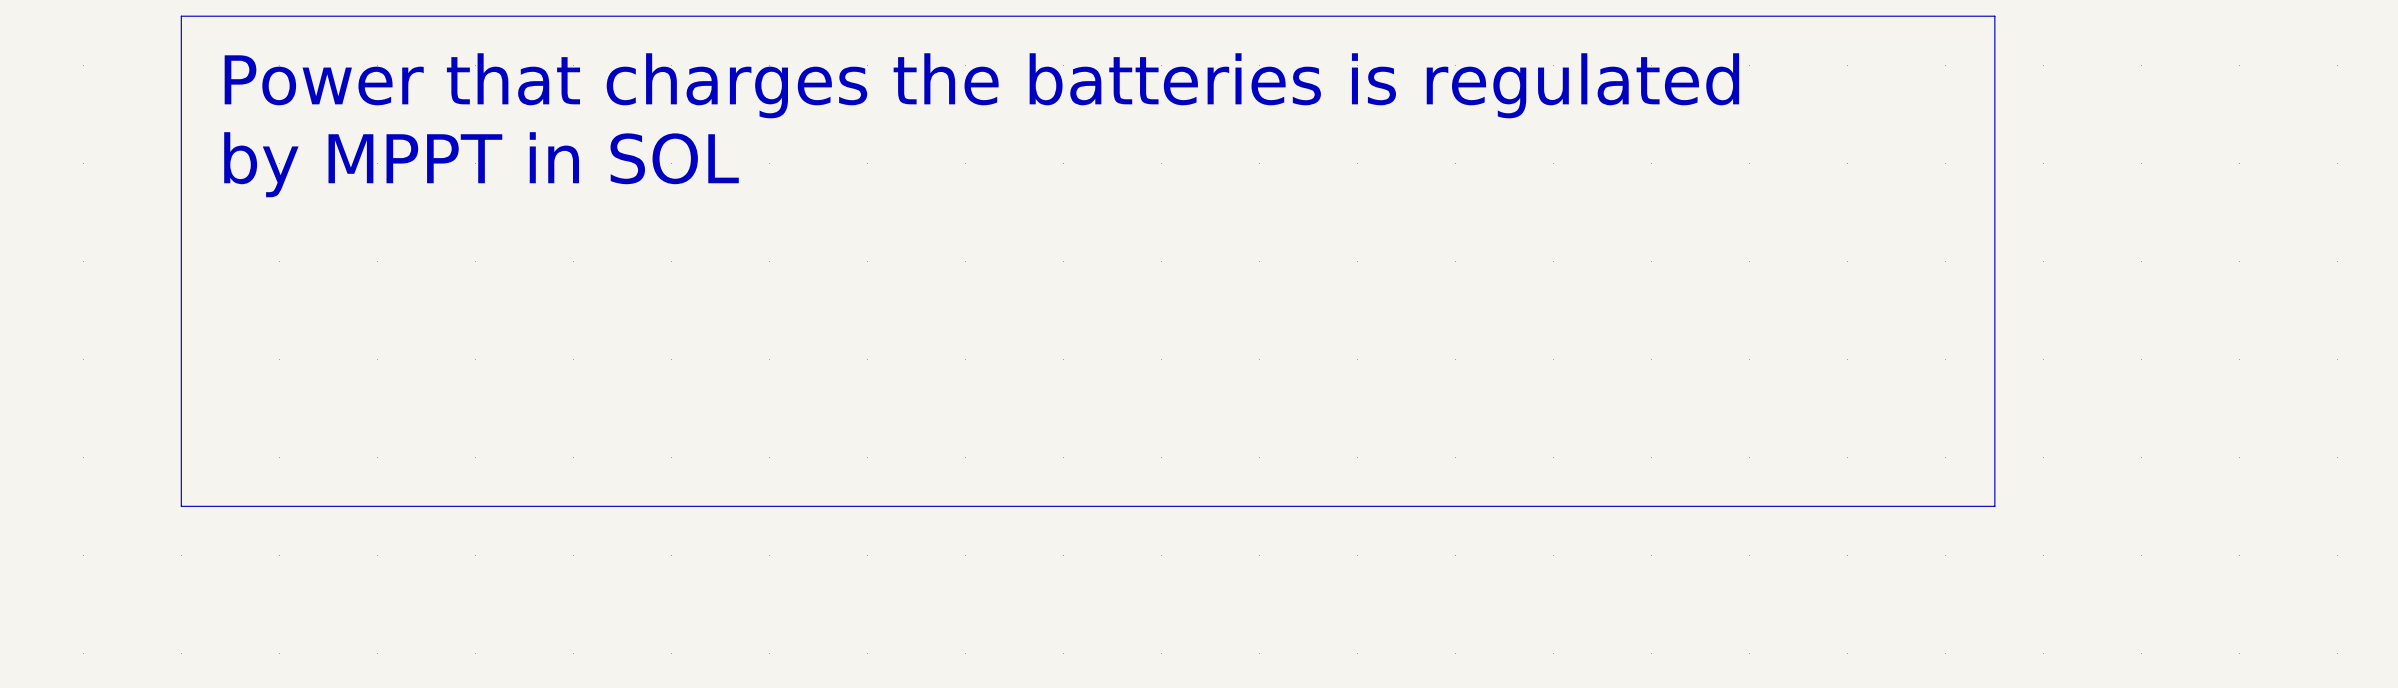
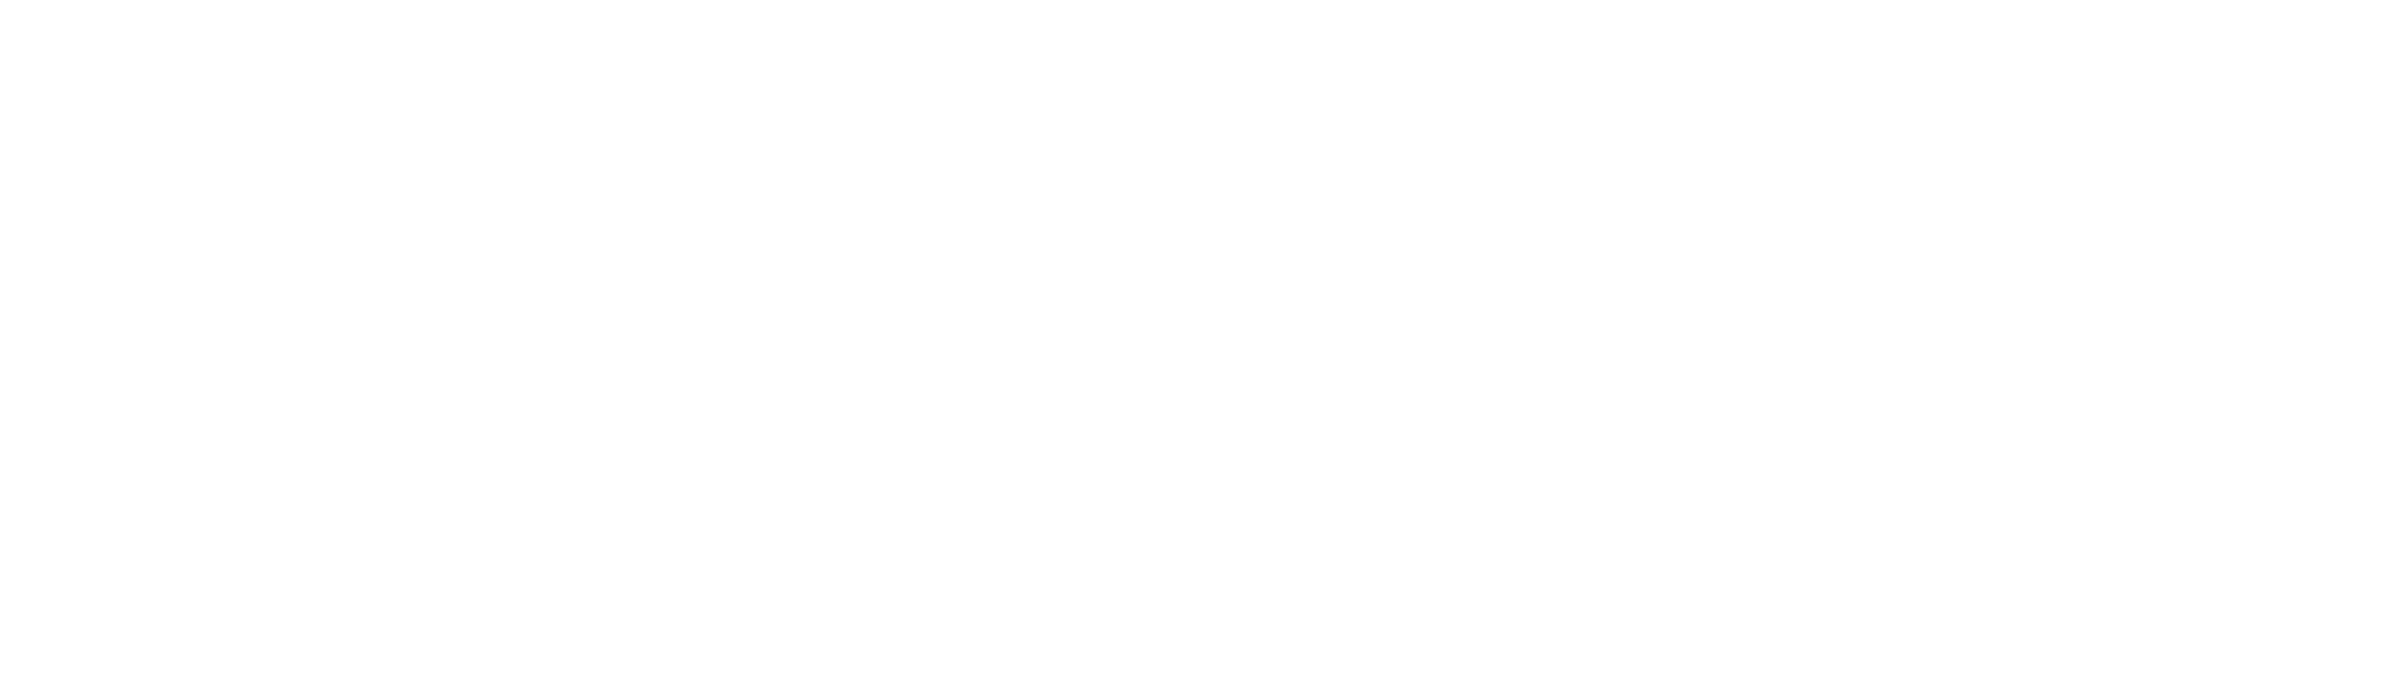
line: (181, 16) (1994, 16) (1994, 506) (181, 506) (181, 16) -> none
text: Power that charges the batteries is regulated (981, 85) -> none
text: by MPPT in SOL (481, 164) -> none

